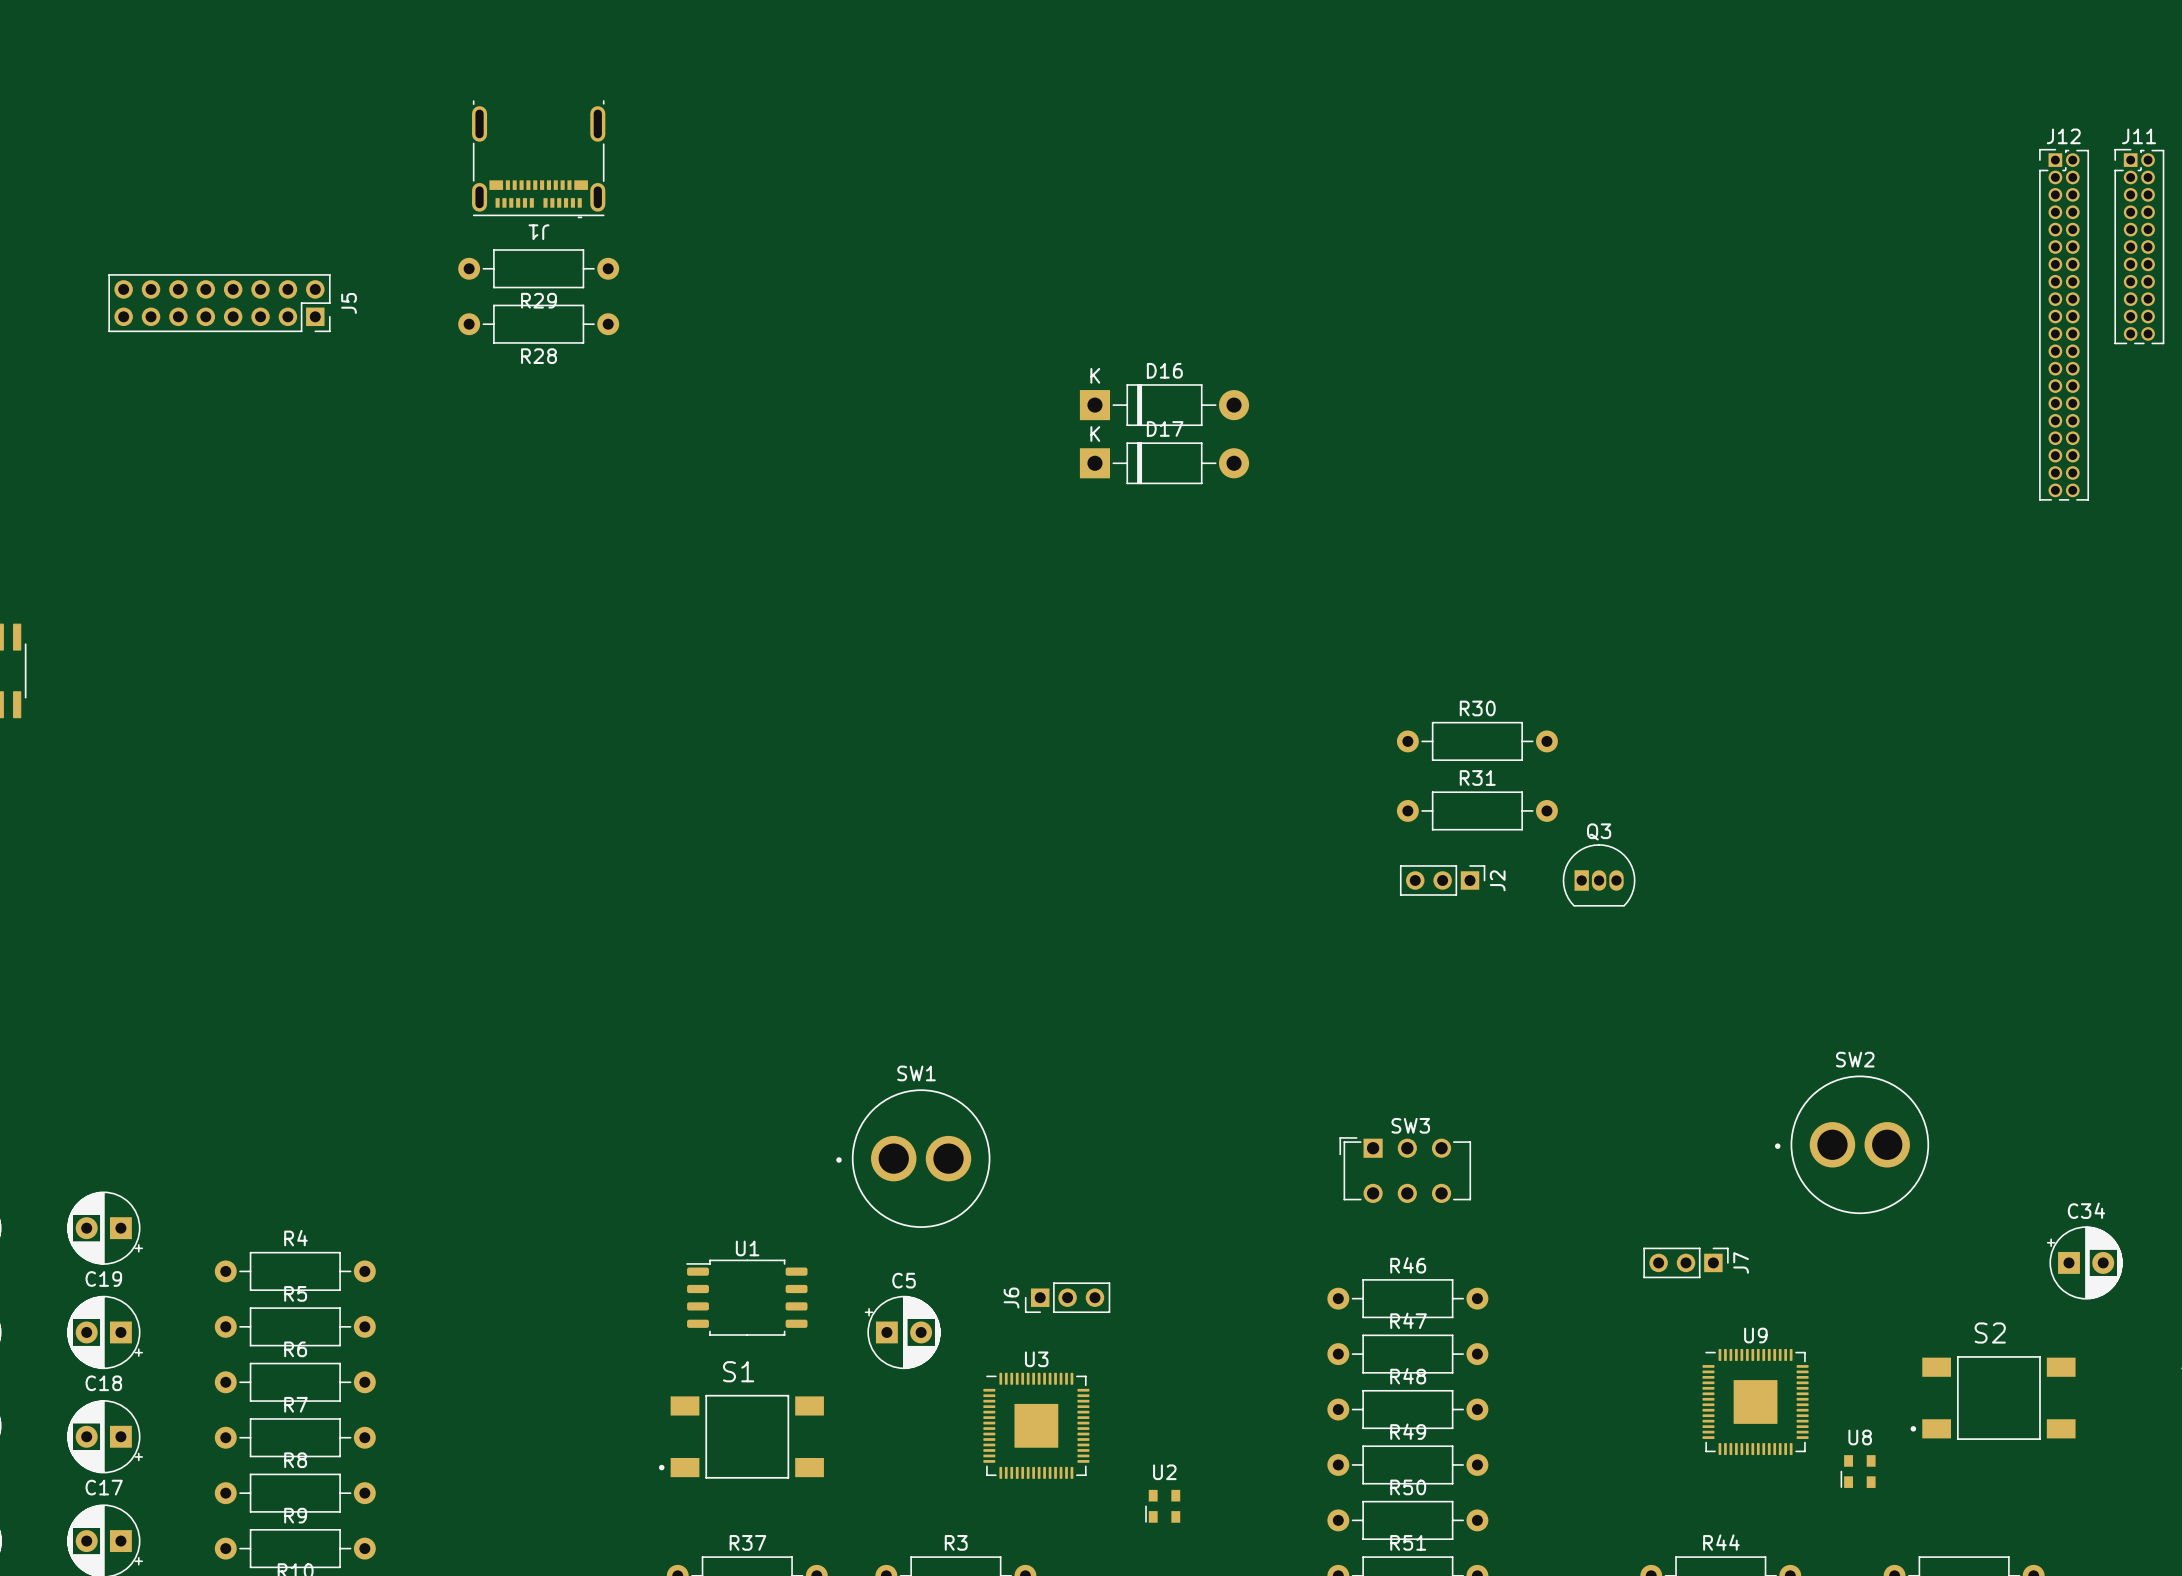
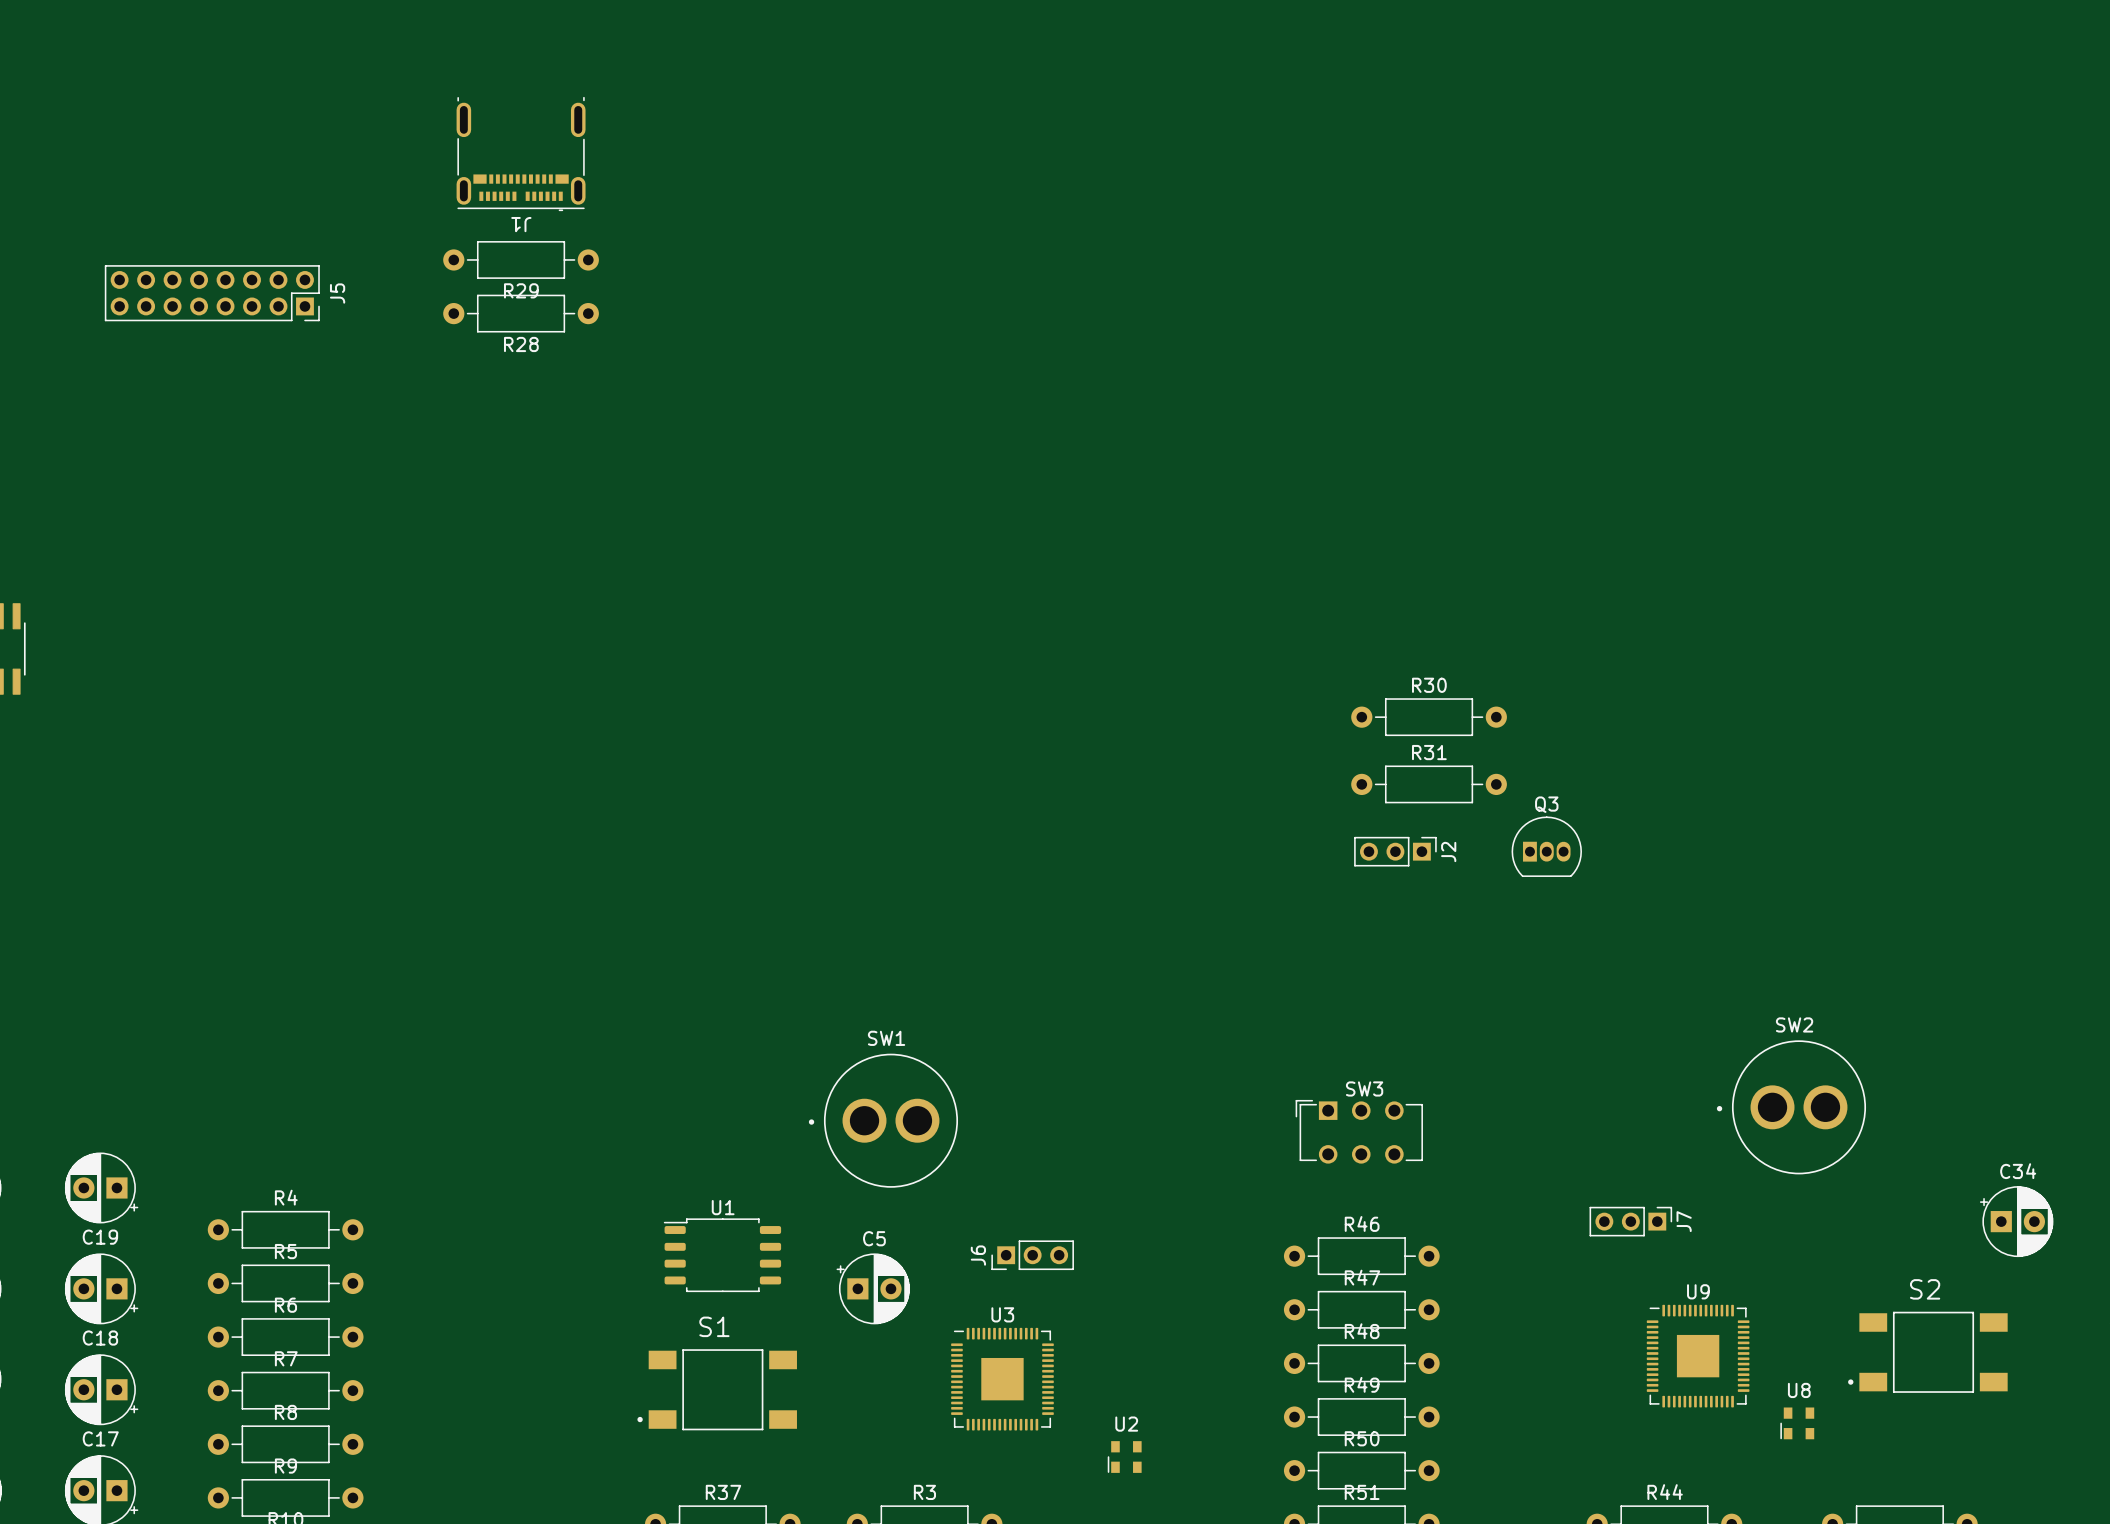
J11: (2139, 246) -> none
J12: (2064, 324) -> none
D16: (1164, 405) -> none
D17: (1164, 463) -> none

